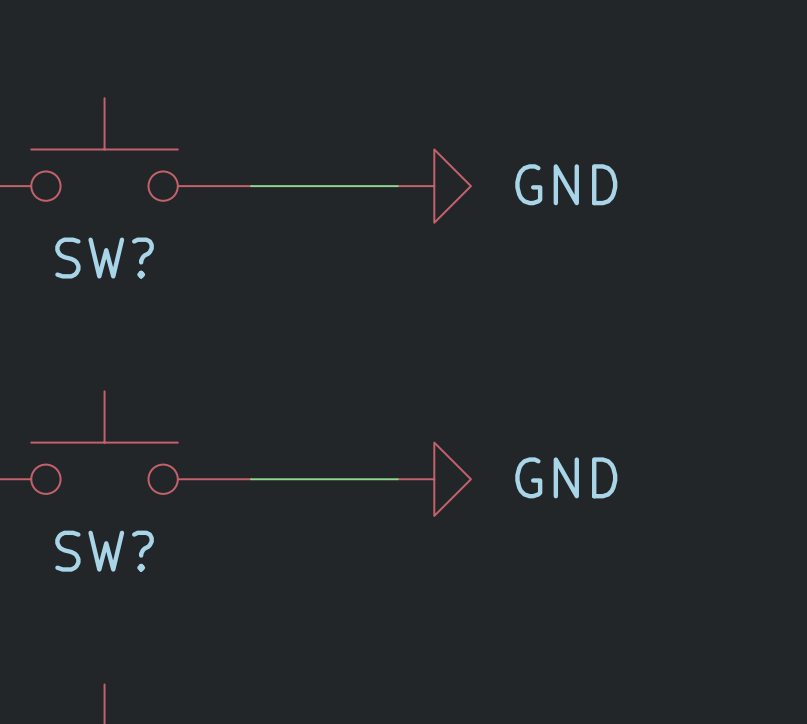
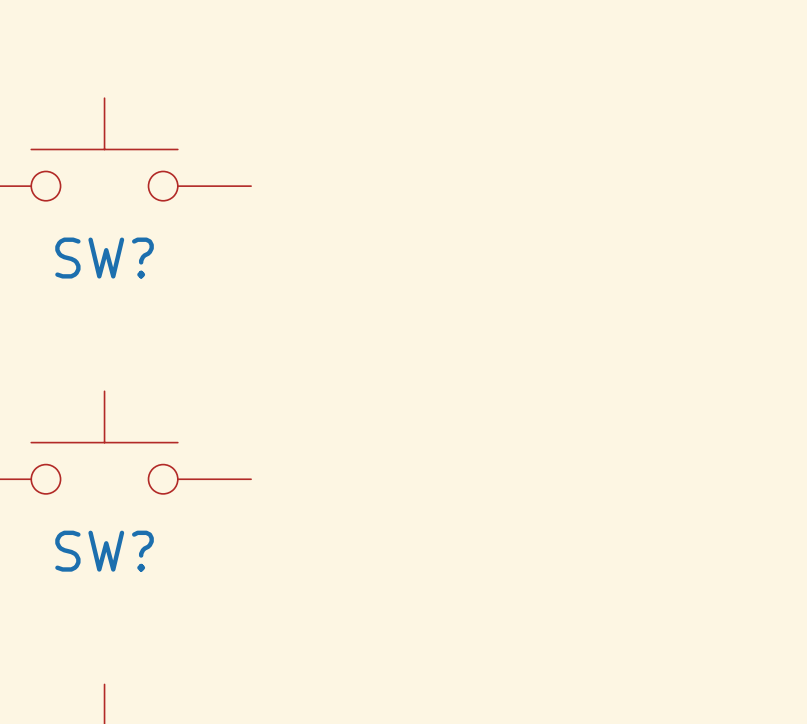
wire: (251, 186) (397, 186) -> none
power symbol: GND (434, 186) -> none
wire: (251, 479) (397, 479) -> none
power symbol: GND (434, 479) -> none

